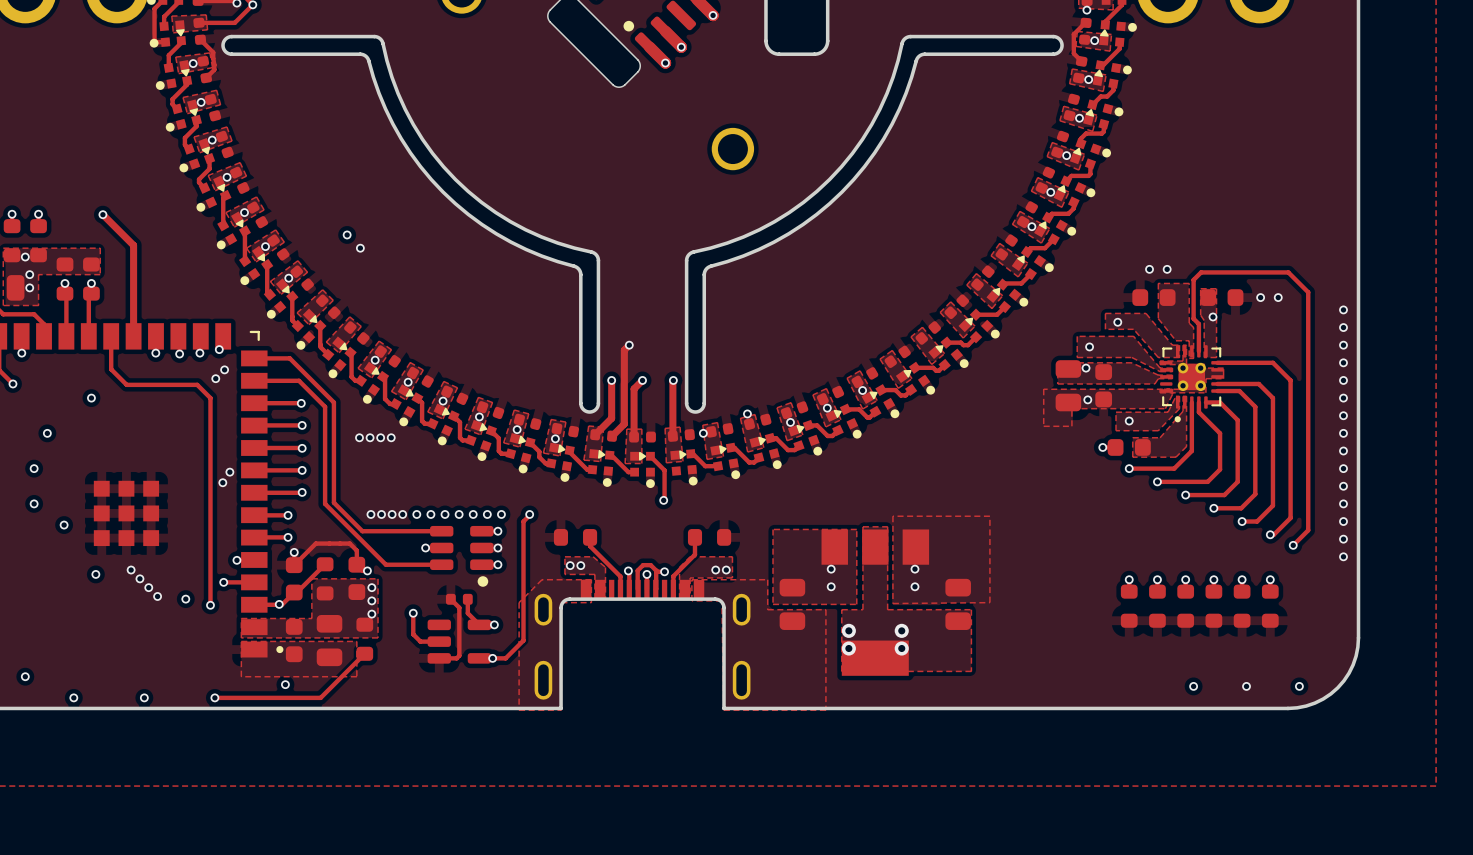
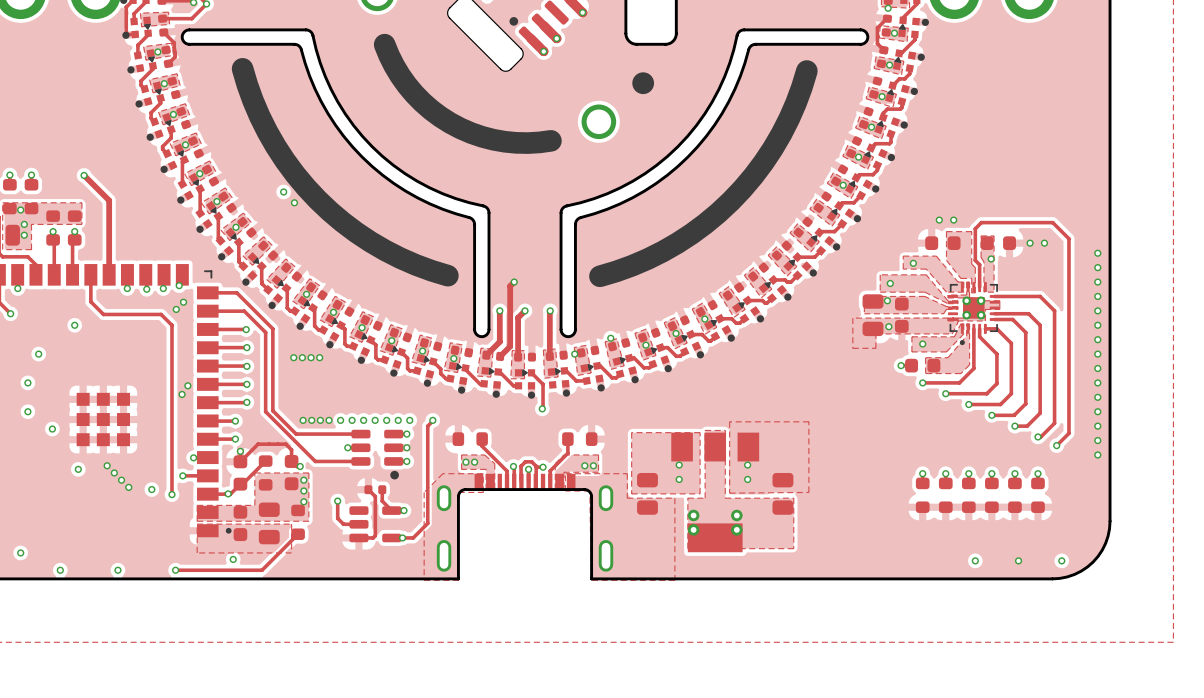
line: none -> (384, 44) (400, 75) (414, 94) (431, 109) (450, 123) (471, 133) (493, 139) (527, 143) (550, 140)
line: none -> (242, 68) (253, 100) (267, 131) (295, 174) (317, 199) (342, 222) (385, 250) (415, 264) (447, 275)
line: none -> (806, 71) (796, 103) (773, 148) (753, 176) (730, 201) (705, 223) (677, 243) (647, 259) (599, 276)
drawing: none -> [632, 72, 655, 95]

